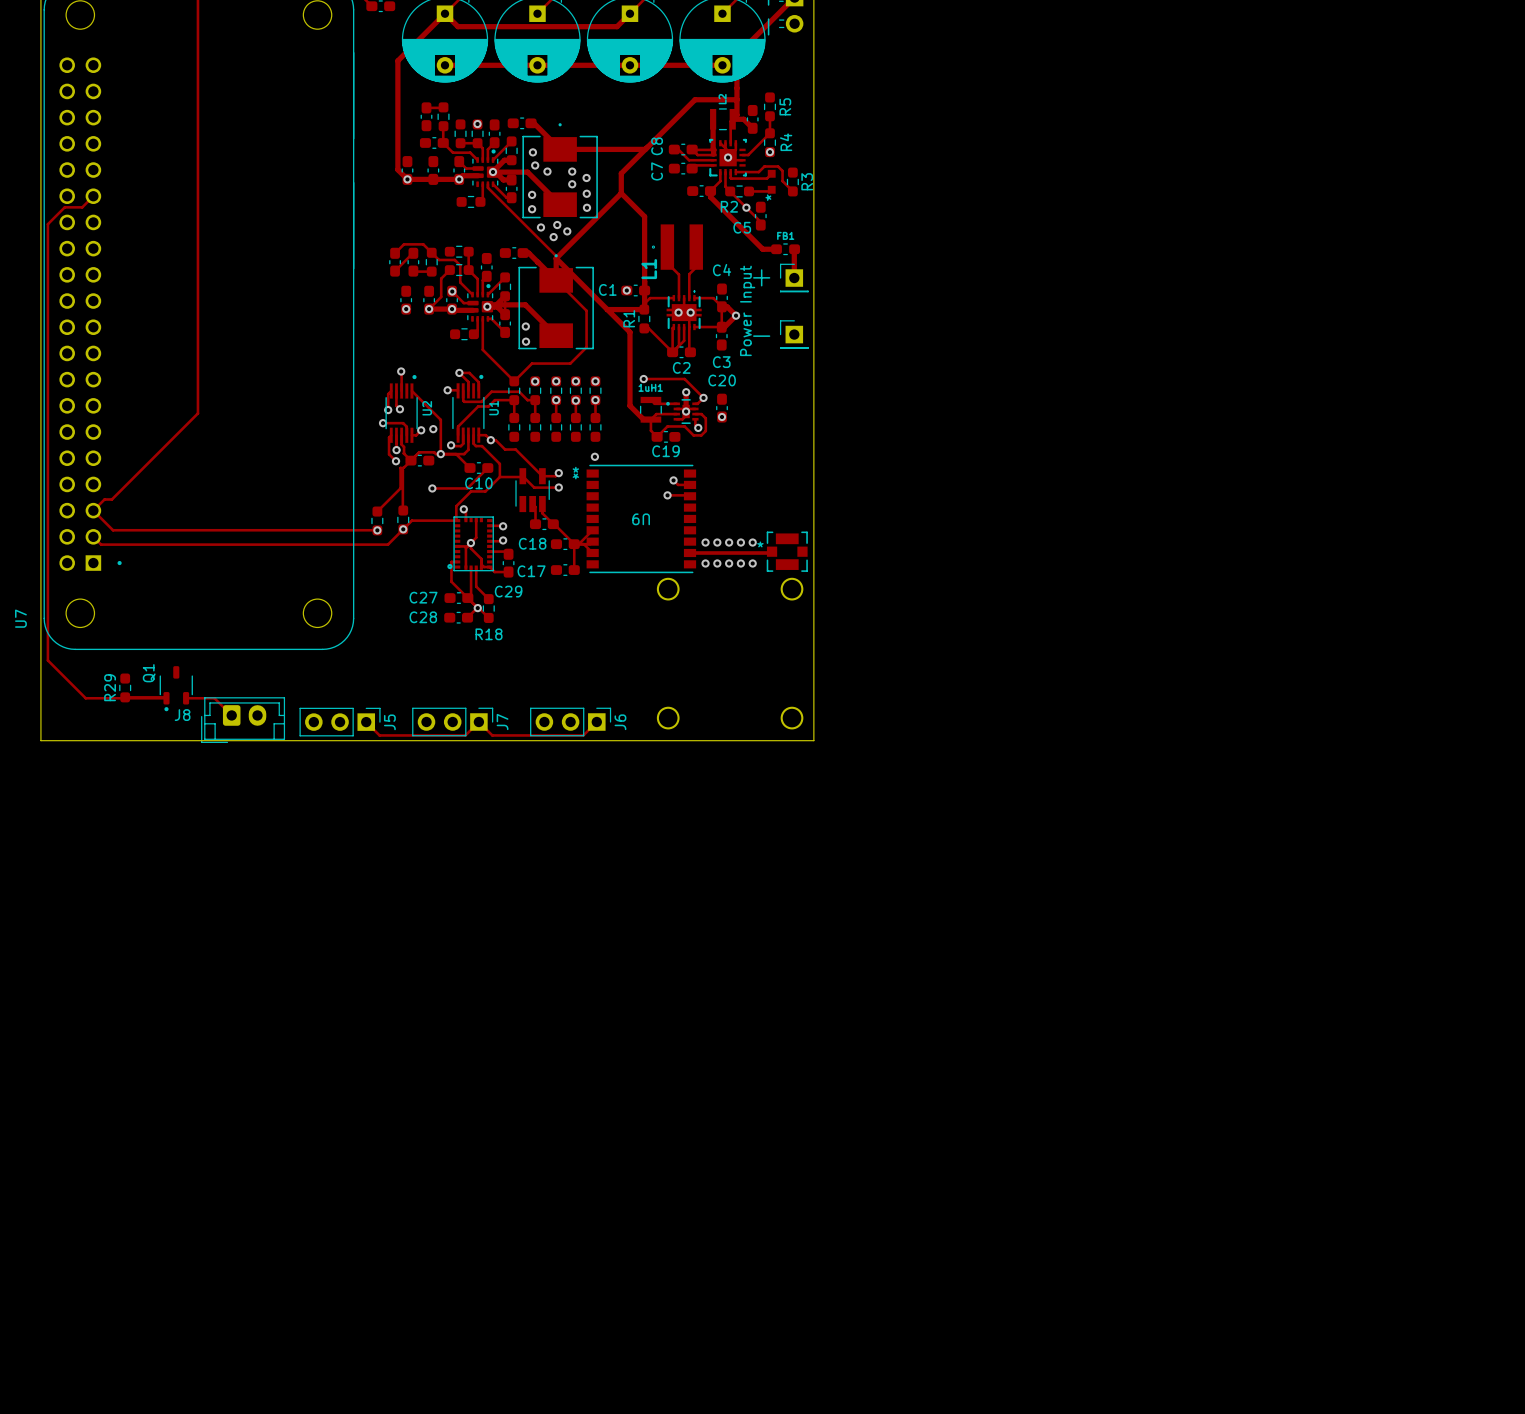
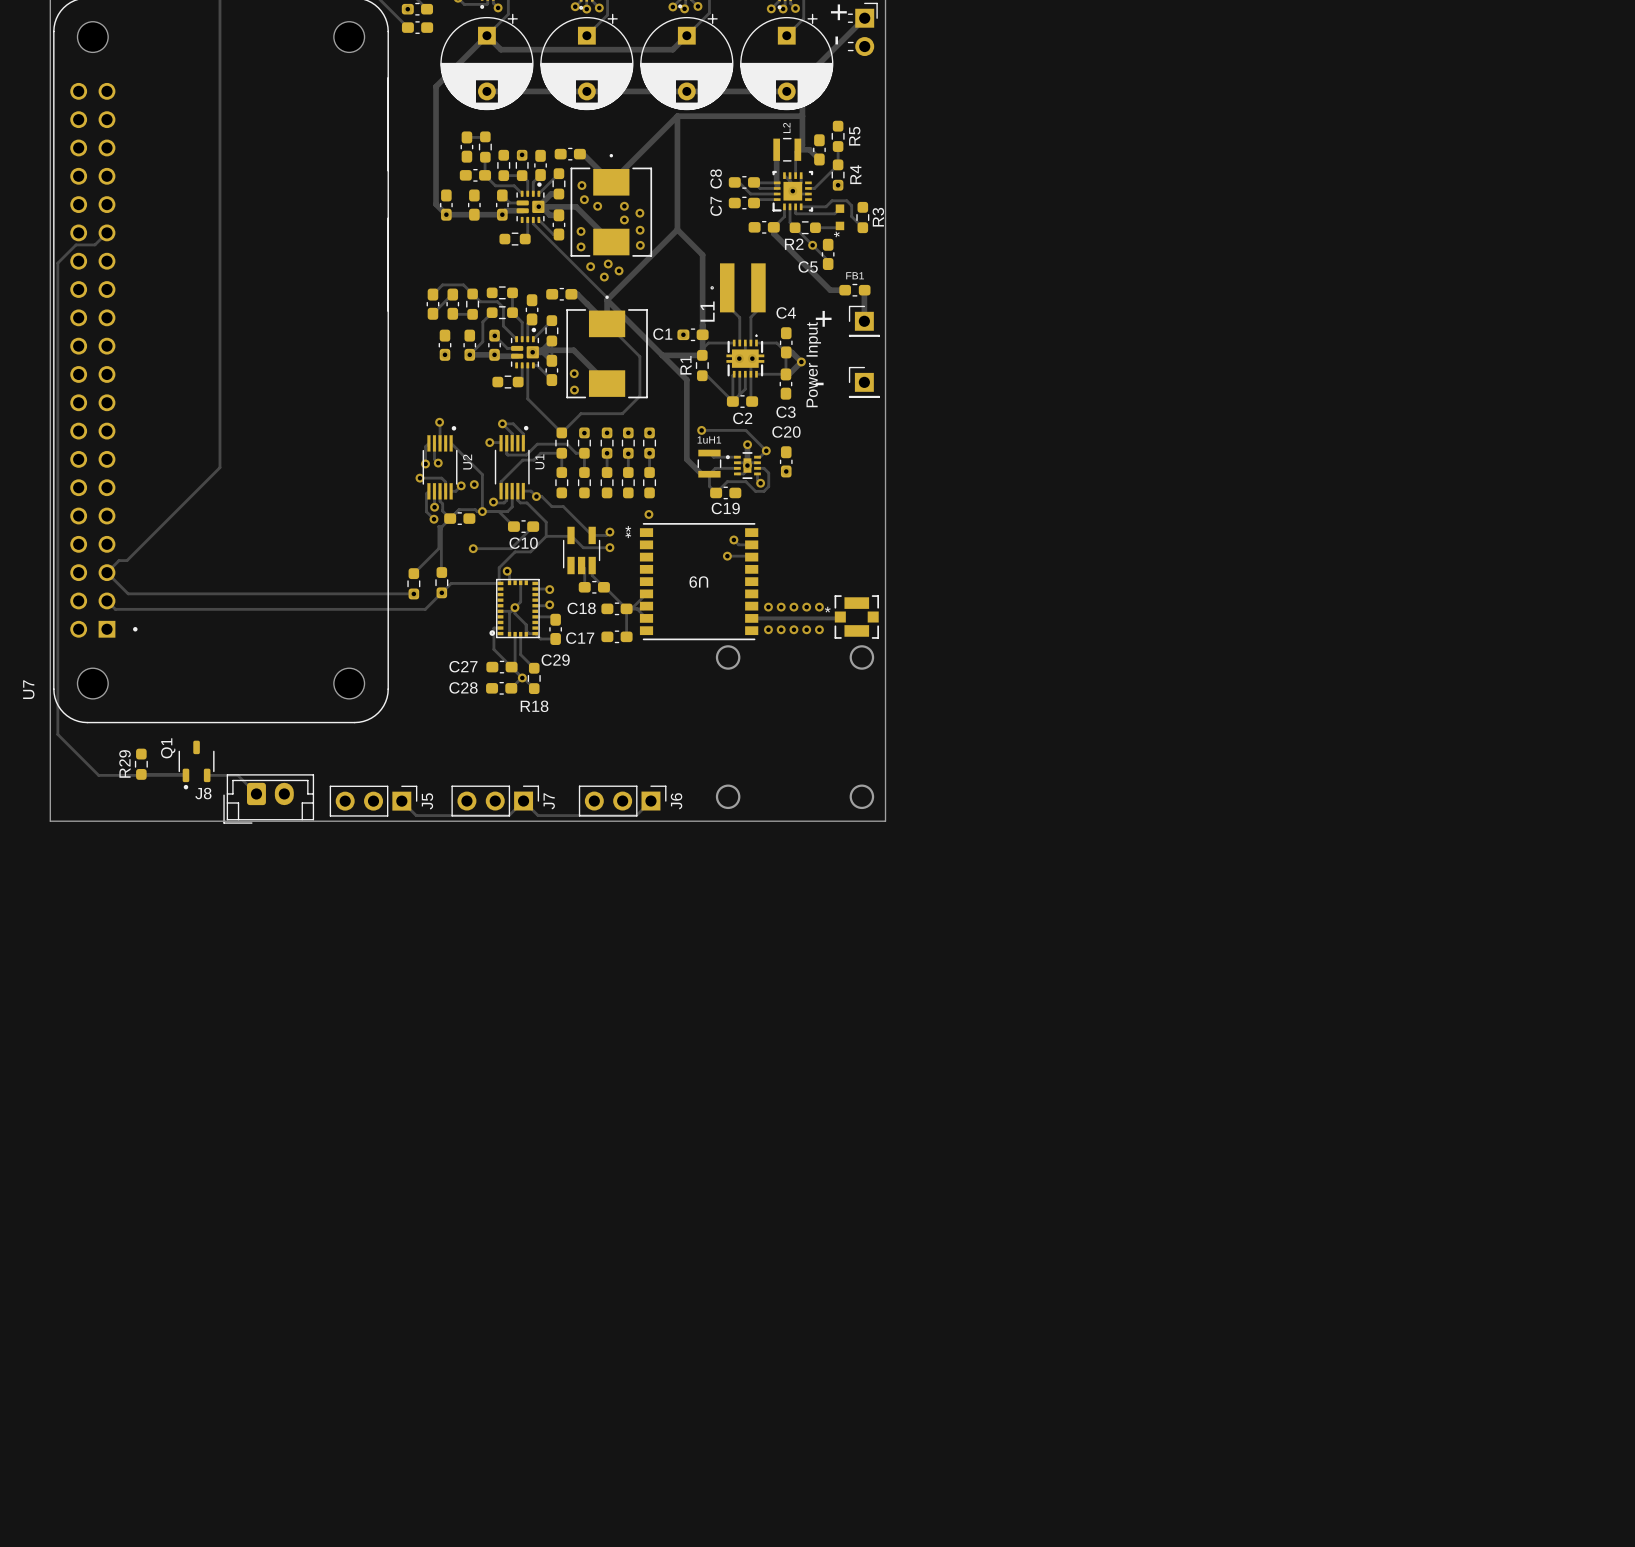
track: none -> (677, 116) (802, 116)
track: (736, 99) (695, 99) (621, 173) -> (677, 116) (677, 208)
track: (560, 149) (645, 149) -> (611, 182) (677, 116)

